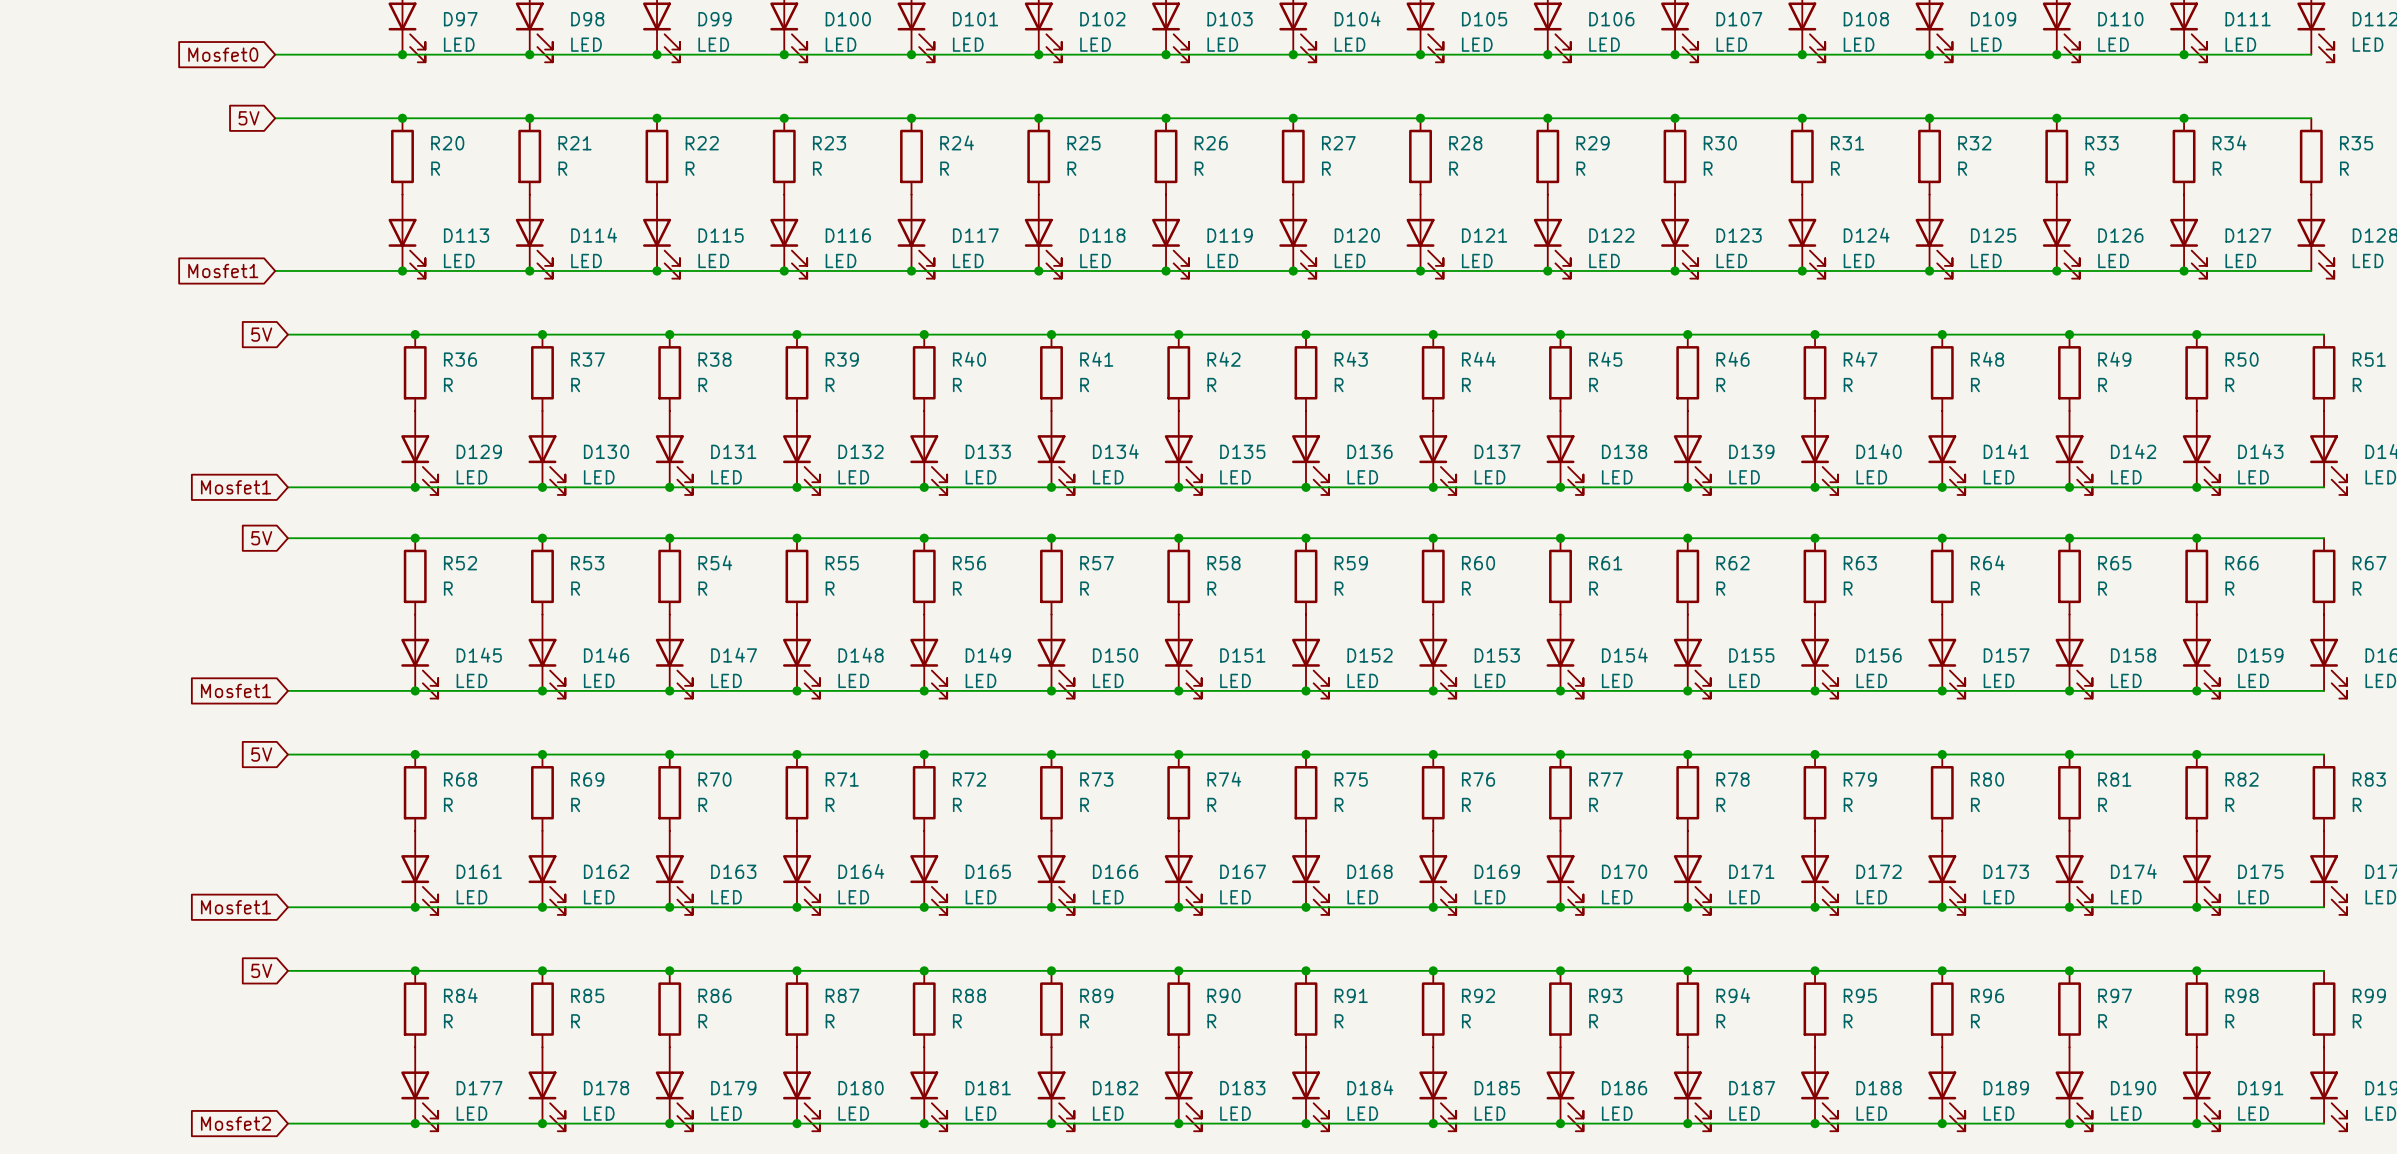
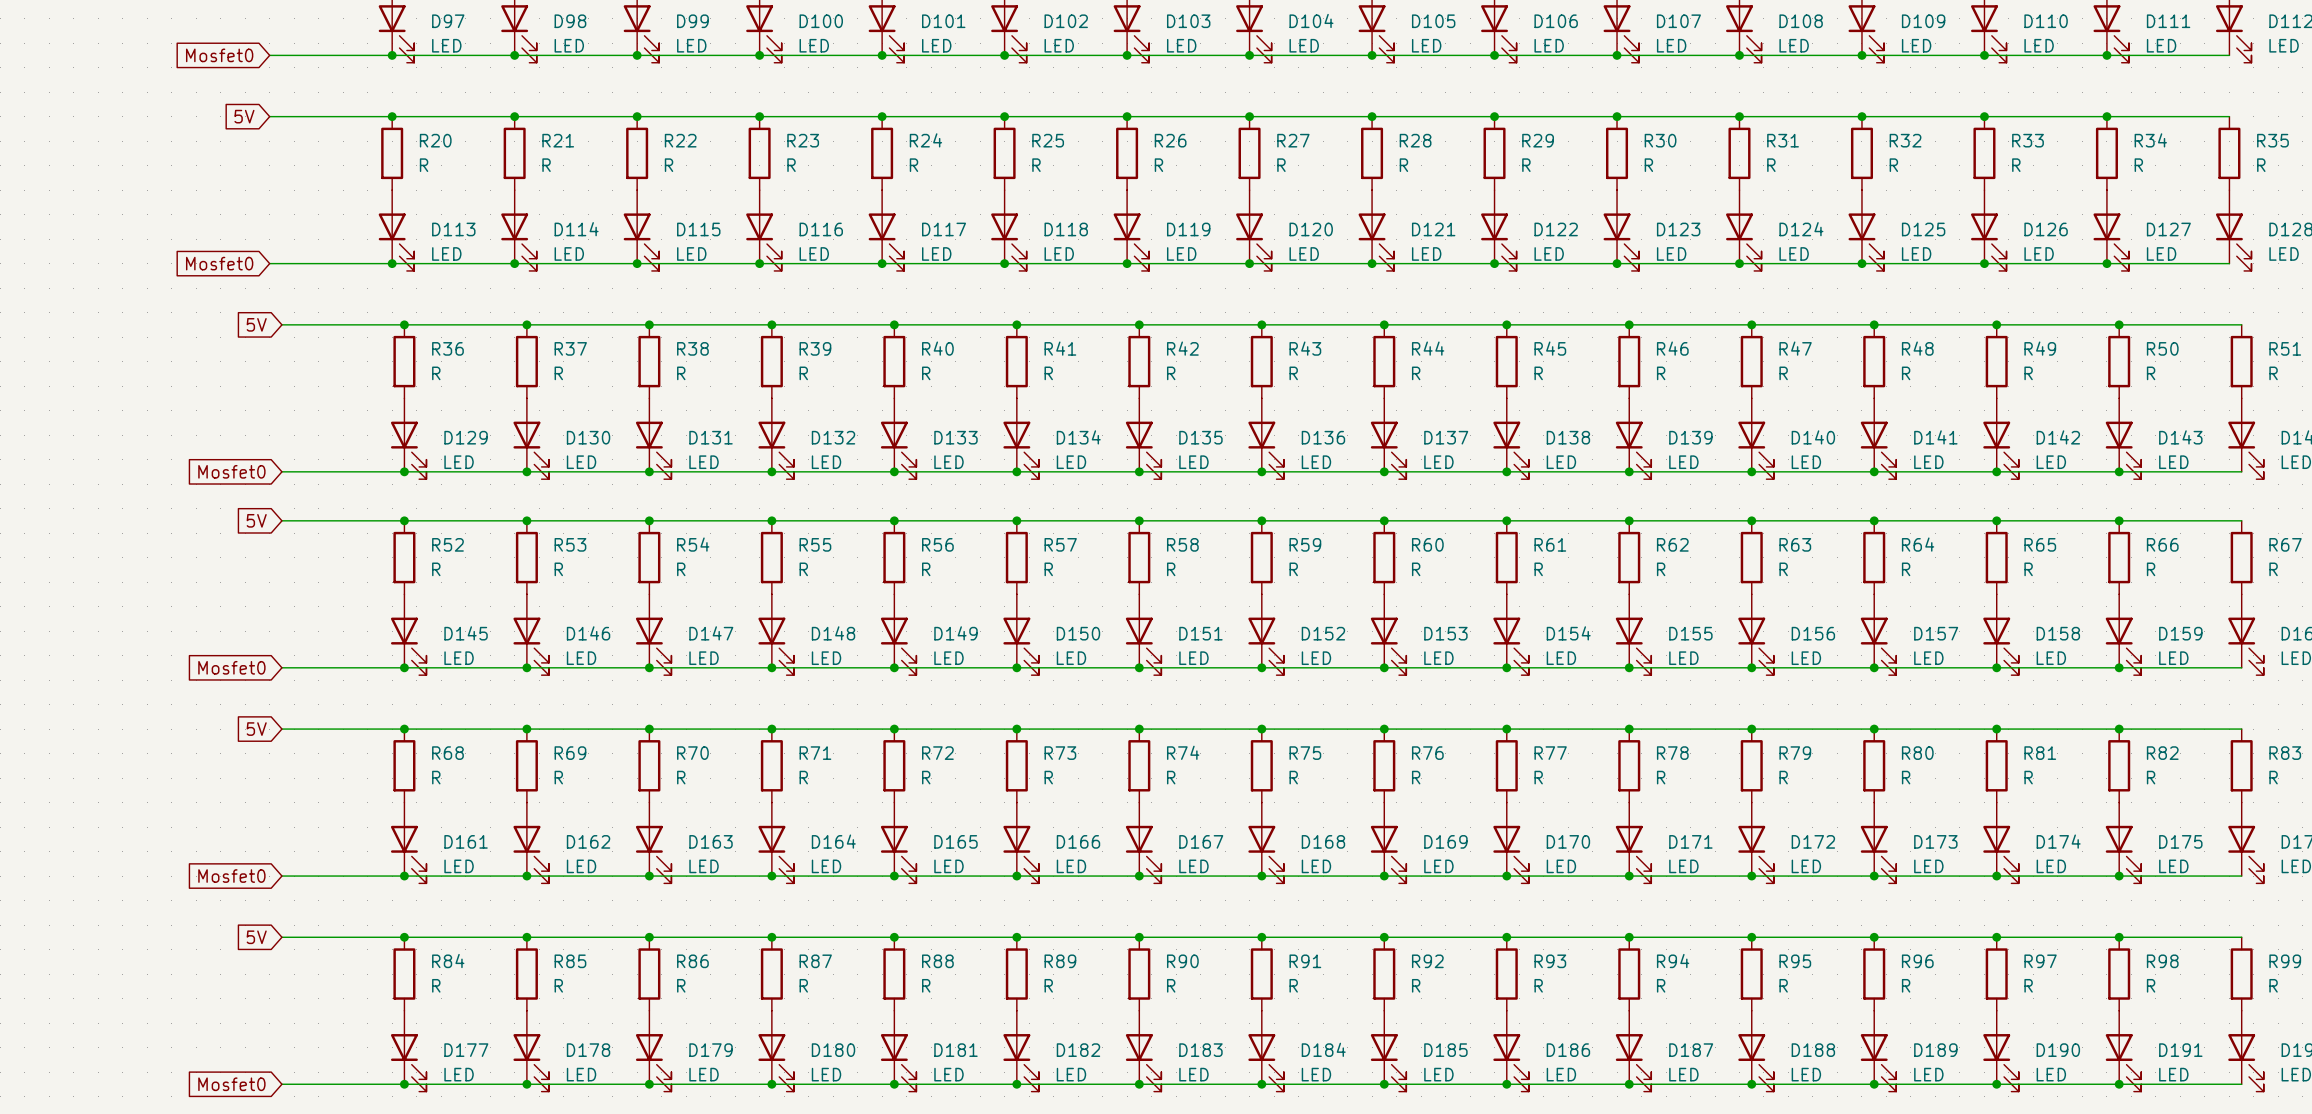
global label: Mosfet1 (223, 270) -> Mosfet0 (219, 263)
global label: Mosfet1 (235, 487) -> Mosfet0 (231, 471)
global label: Mosfet1 (235, 690) -> Mosfet0 (231, 667)
global label: Mosfet1 (235, 907) -> Mosfet0 (231, 876)
global label: Mosfet2 (235, 1123) -> Mosfet0 (231, 1084)

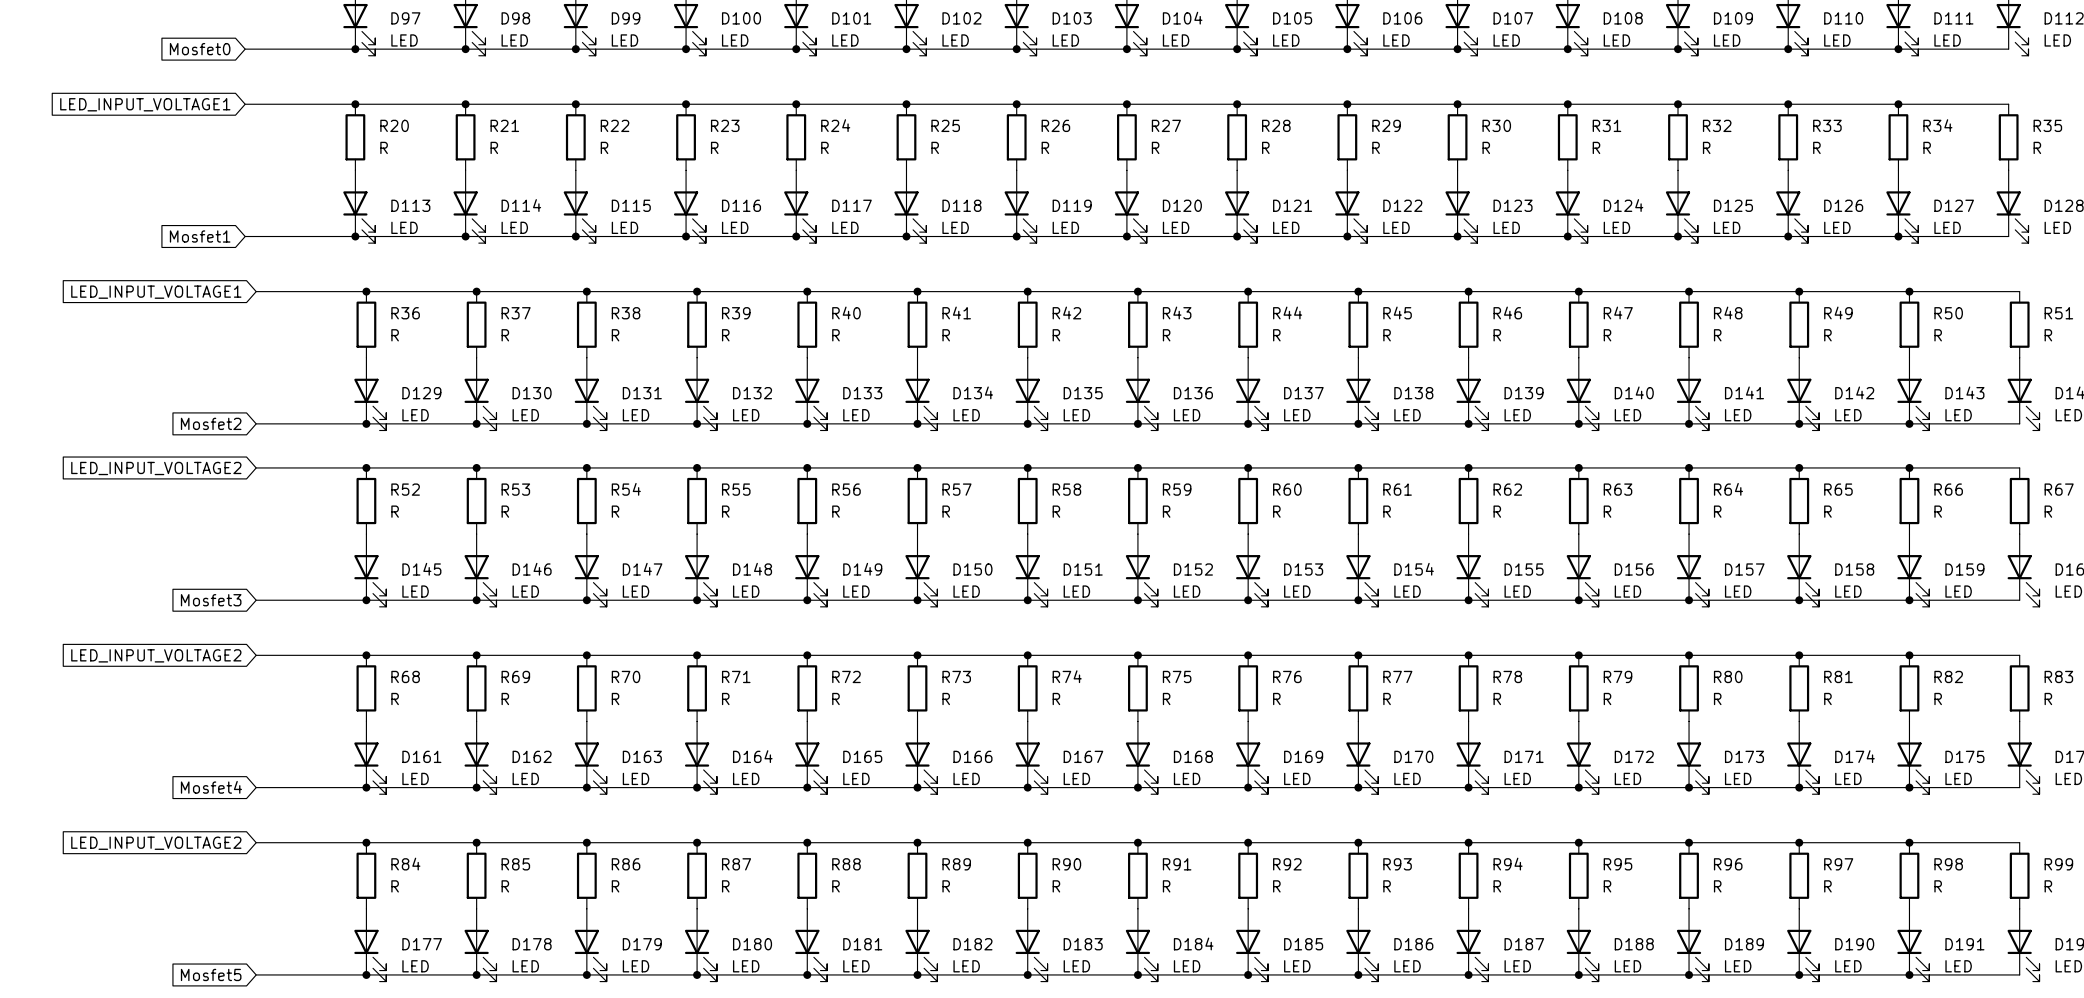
global label: 5V (244, 116) -> LED_INPUT_VOLTAGE1 (145, 104)
global label: Mosfet0 (219, 263) -> Mosfet1 (200, 236)
global label: 5V (256, 324) -> LED_INPUT_VOLTAGE1 (156, 292)
global label: Mosfet0 (231, 471) -> Mosfet2 (211, 423)
global label: 5V (256, 520) -> LED_INPUT_VOLTAGE2 (156, 468)
global label: Mosfet0 (231, 667) -> Mosfet3 (211, 600)
global label: 5V (256, 729) -> LED_INPUT_VOLTAGE2 (156, 655)
global label: Mosfet0 (231, 876) -> Mosfet4 (211, 787)
global label: 5V (256, 937) -> LED_INPUT_VOLTAGE2 (156, 843)
global label: Mosfet0 (231, 1084) -> Mosfet5 (211, 974)

